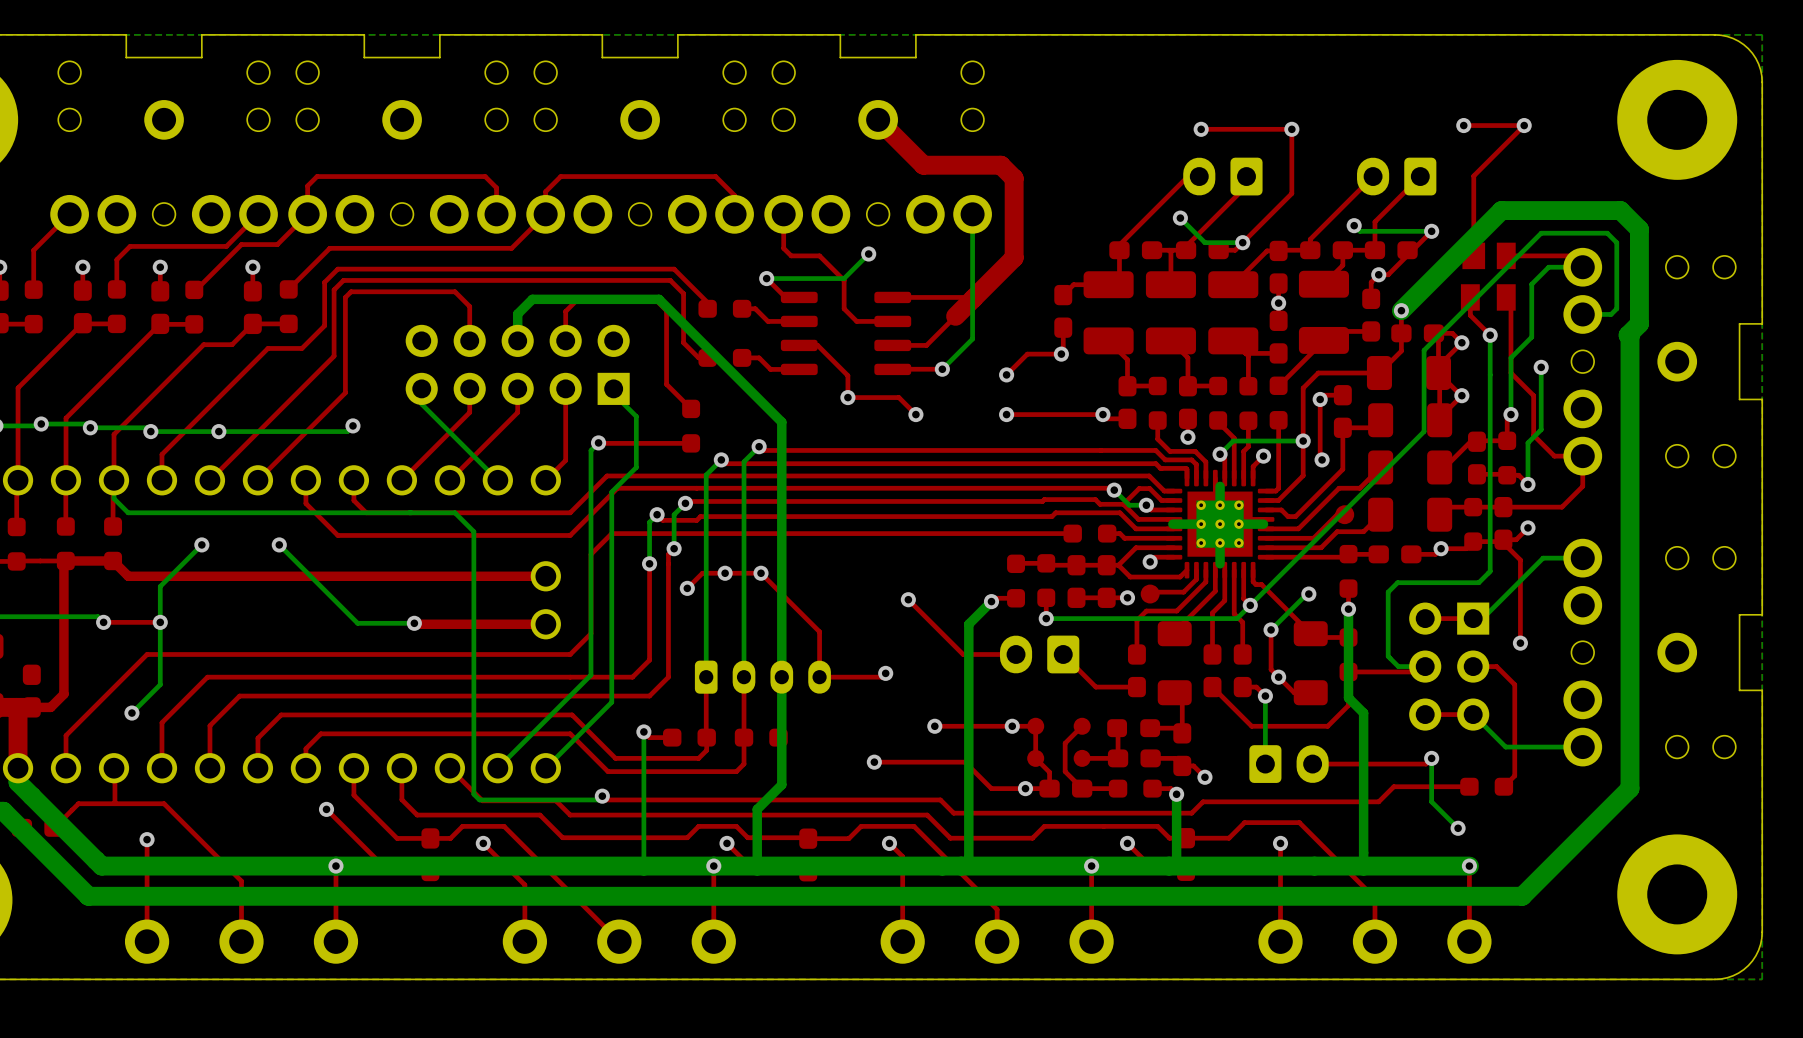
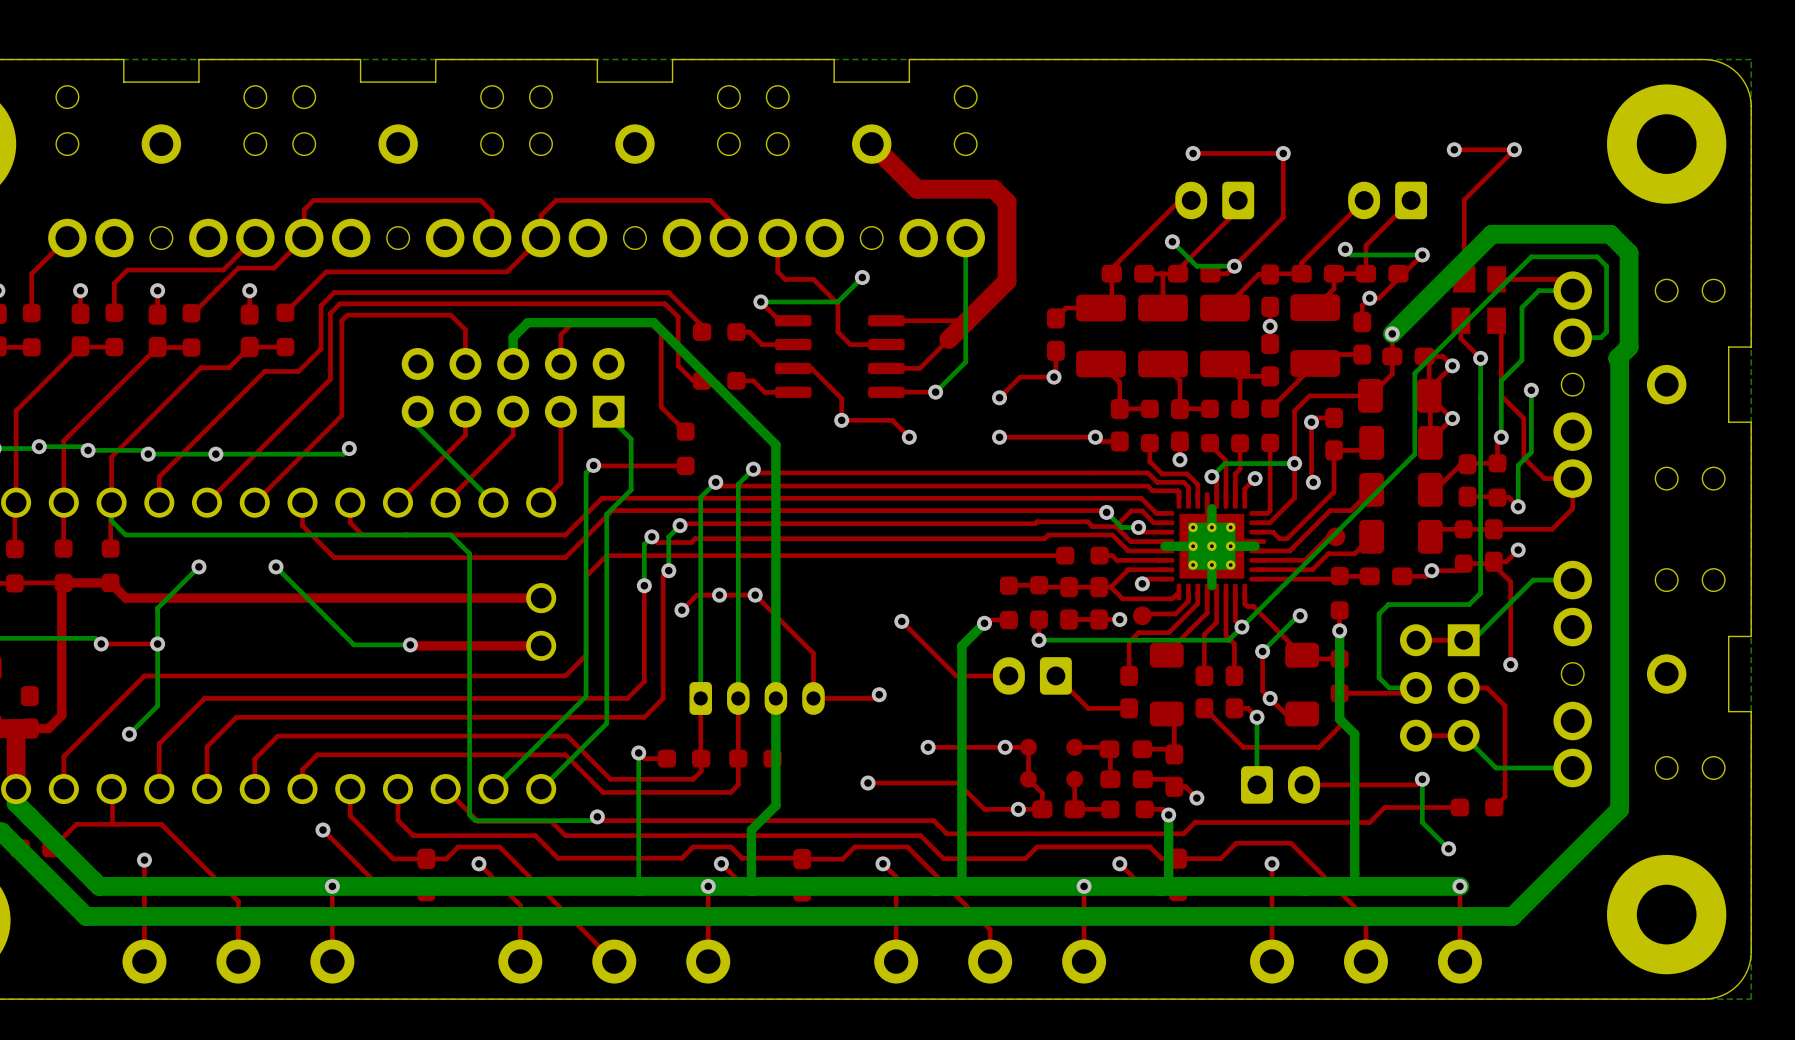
top track: (1082, 726) (1065, 743) (1065, 771) (1082, 788) -> (1074, 779) (1074, 809)
top track: none -> (1074, 747) (1107, 747) (1109, 749)
top track: (1118, 758) (1082, 758) -> none

